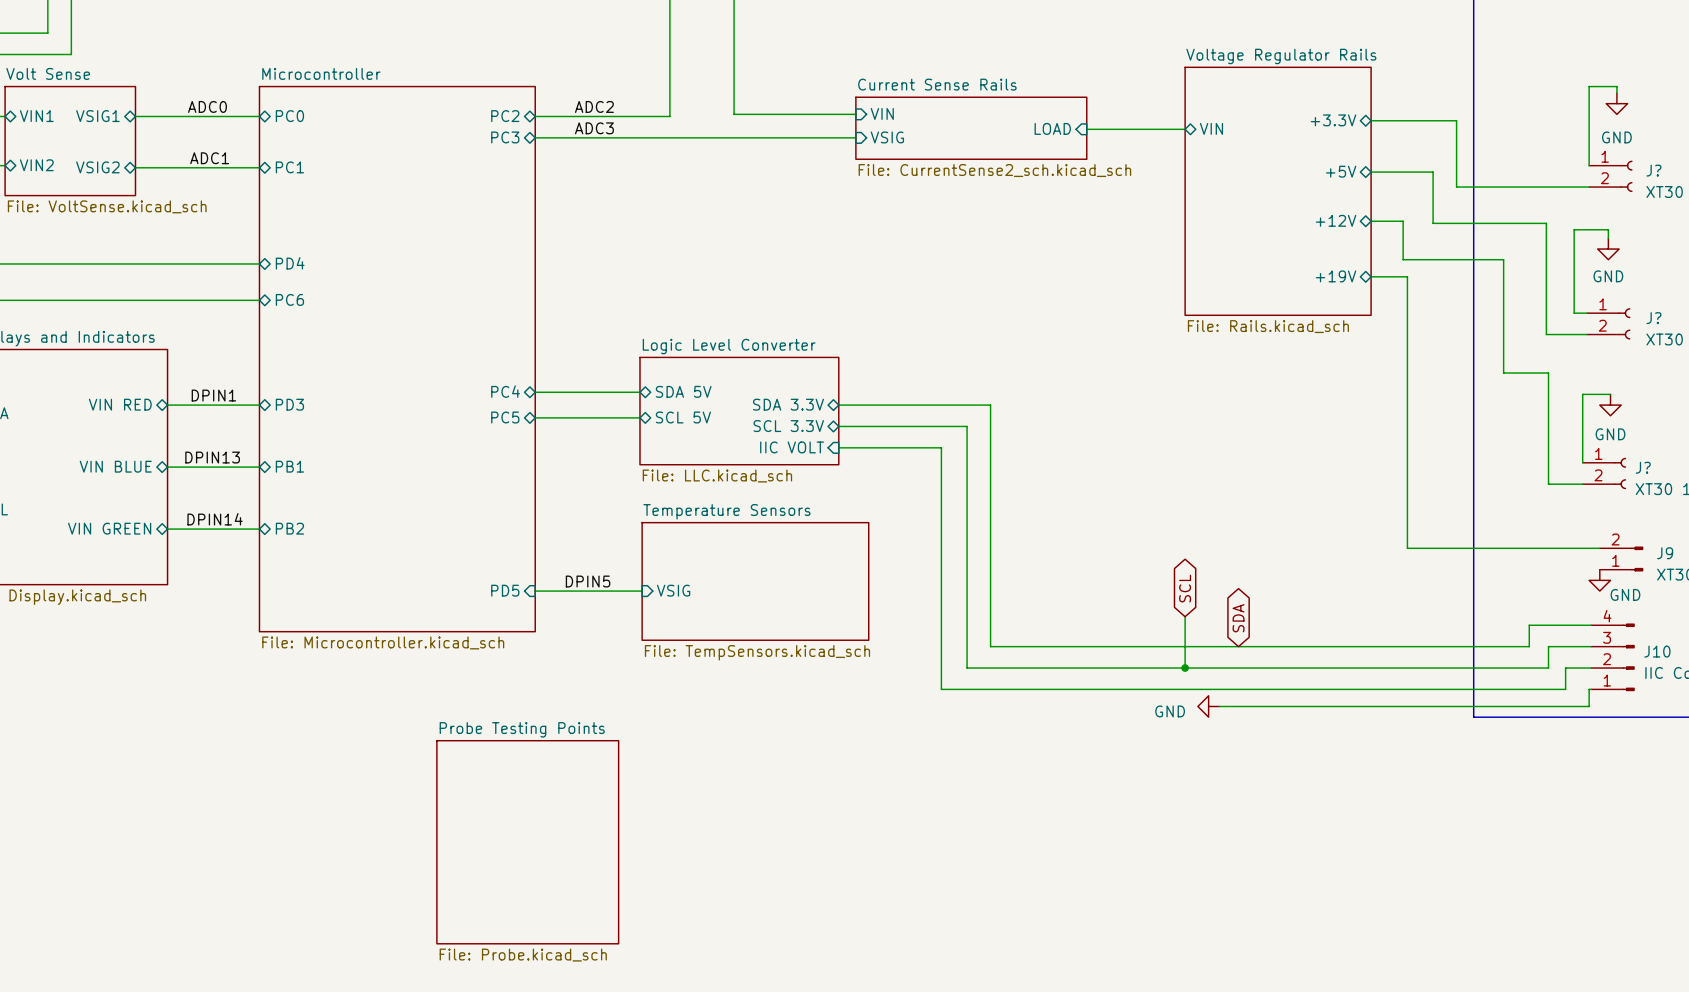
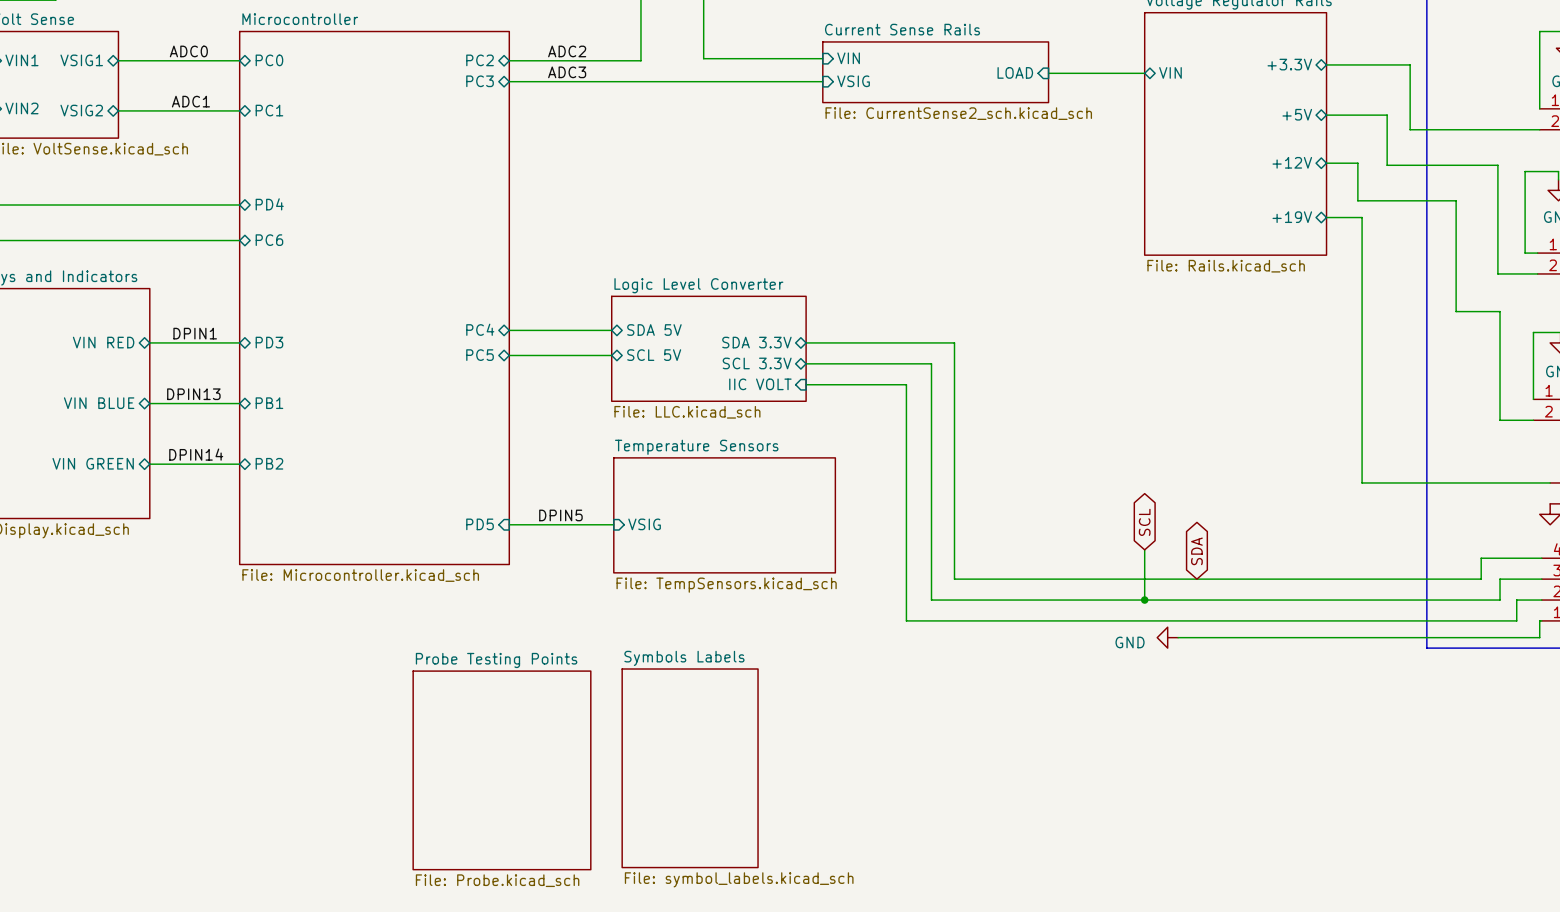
sheet Symbols Labels: none -> File: symbol_labels.kicad_sch (690, 768)

